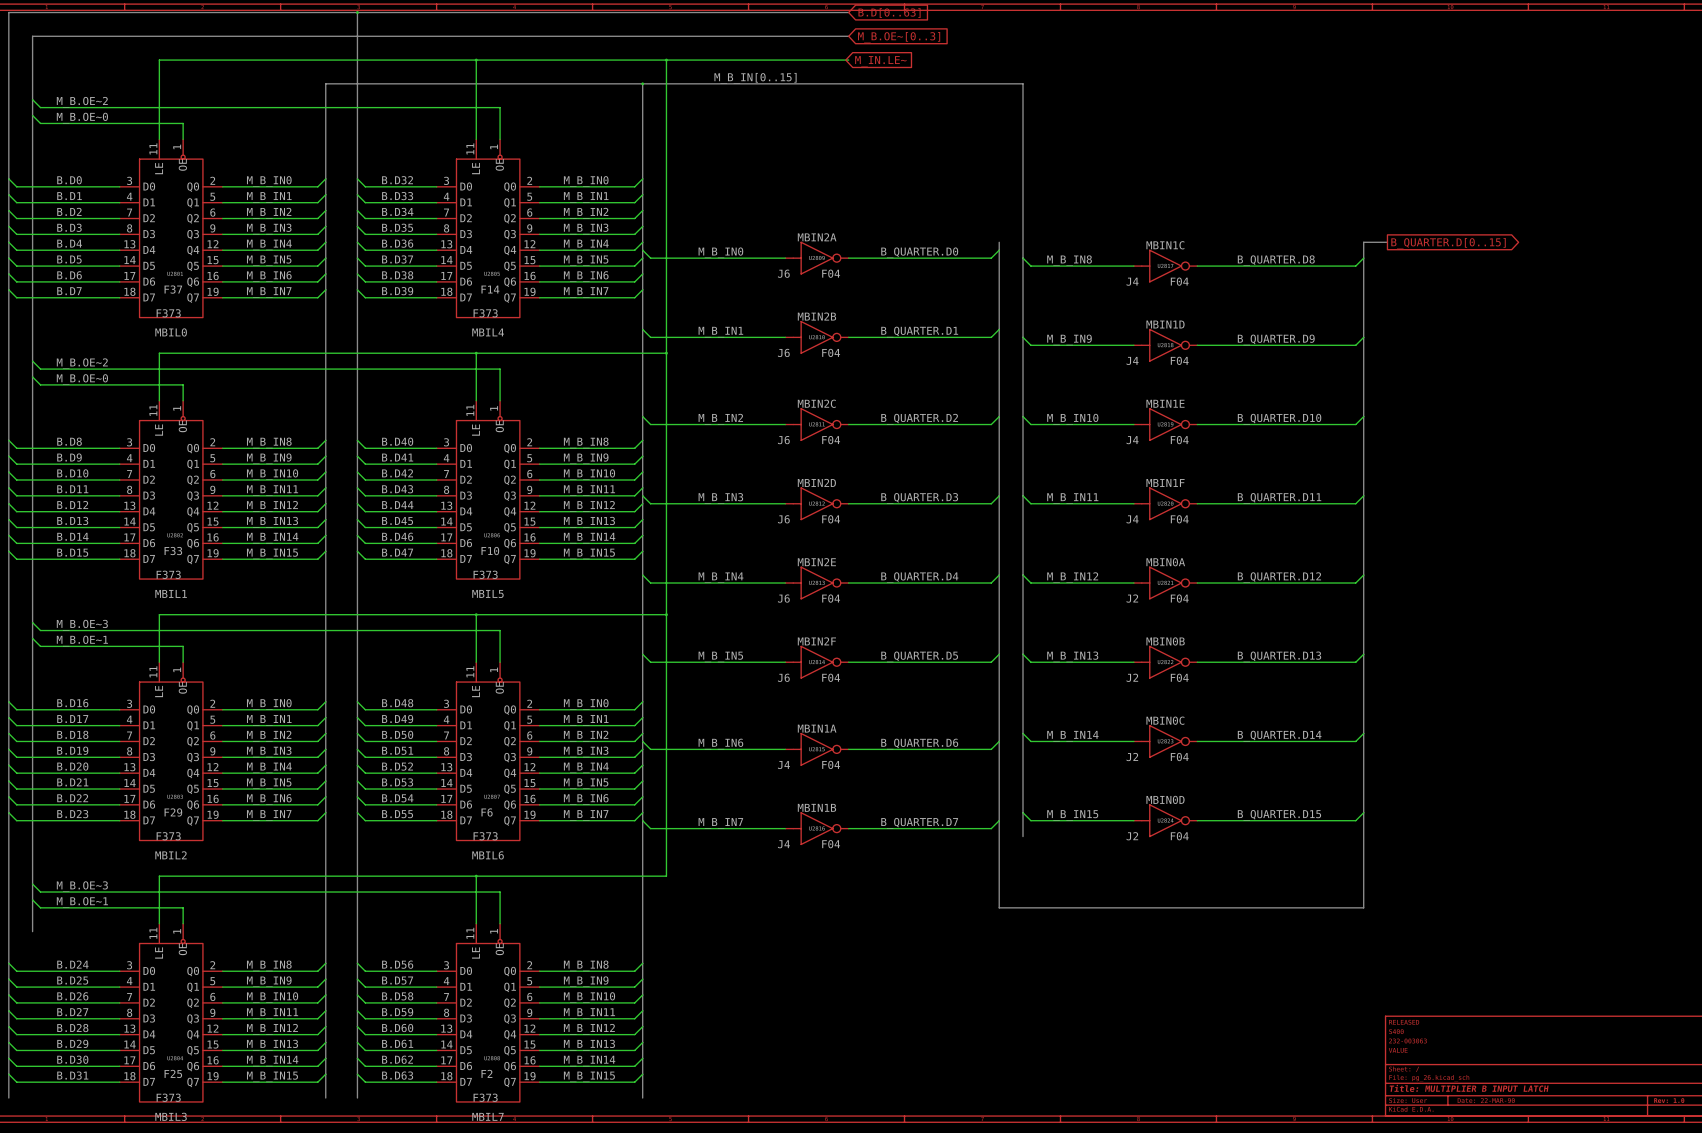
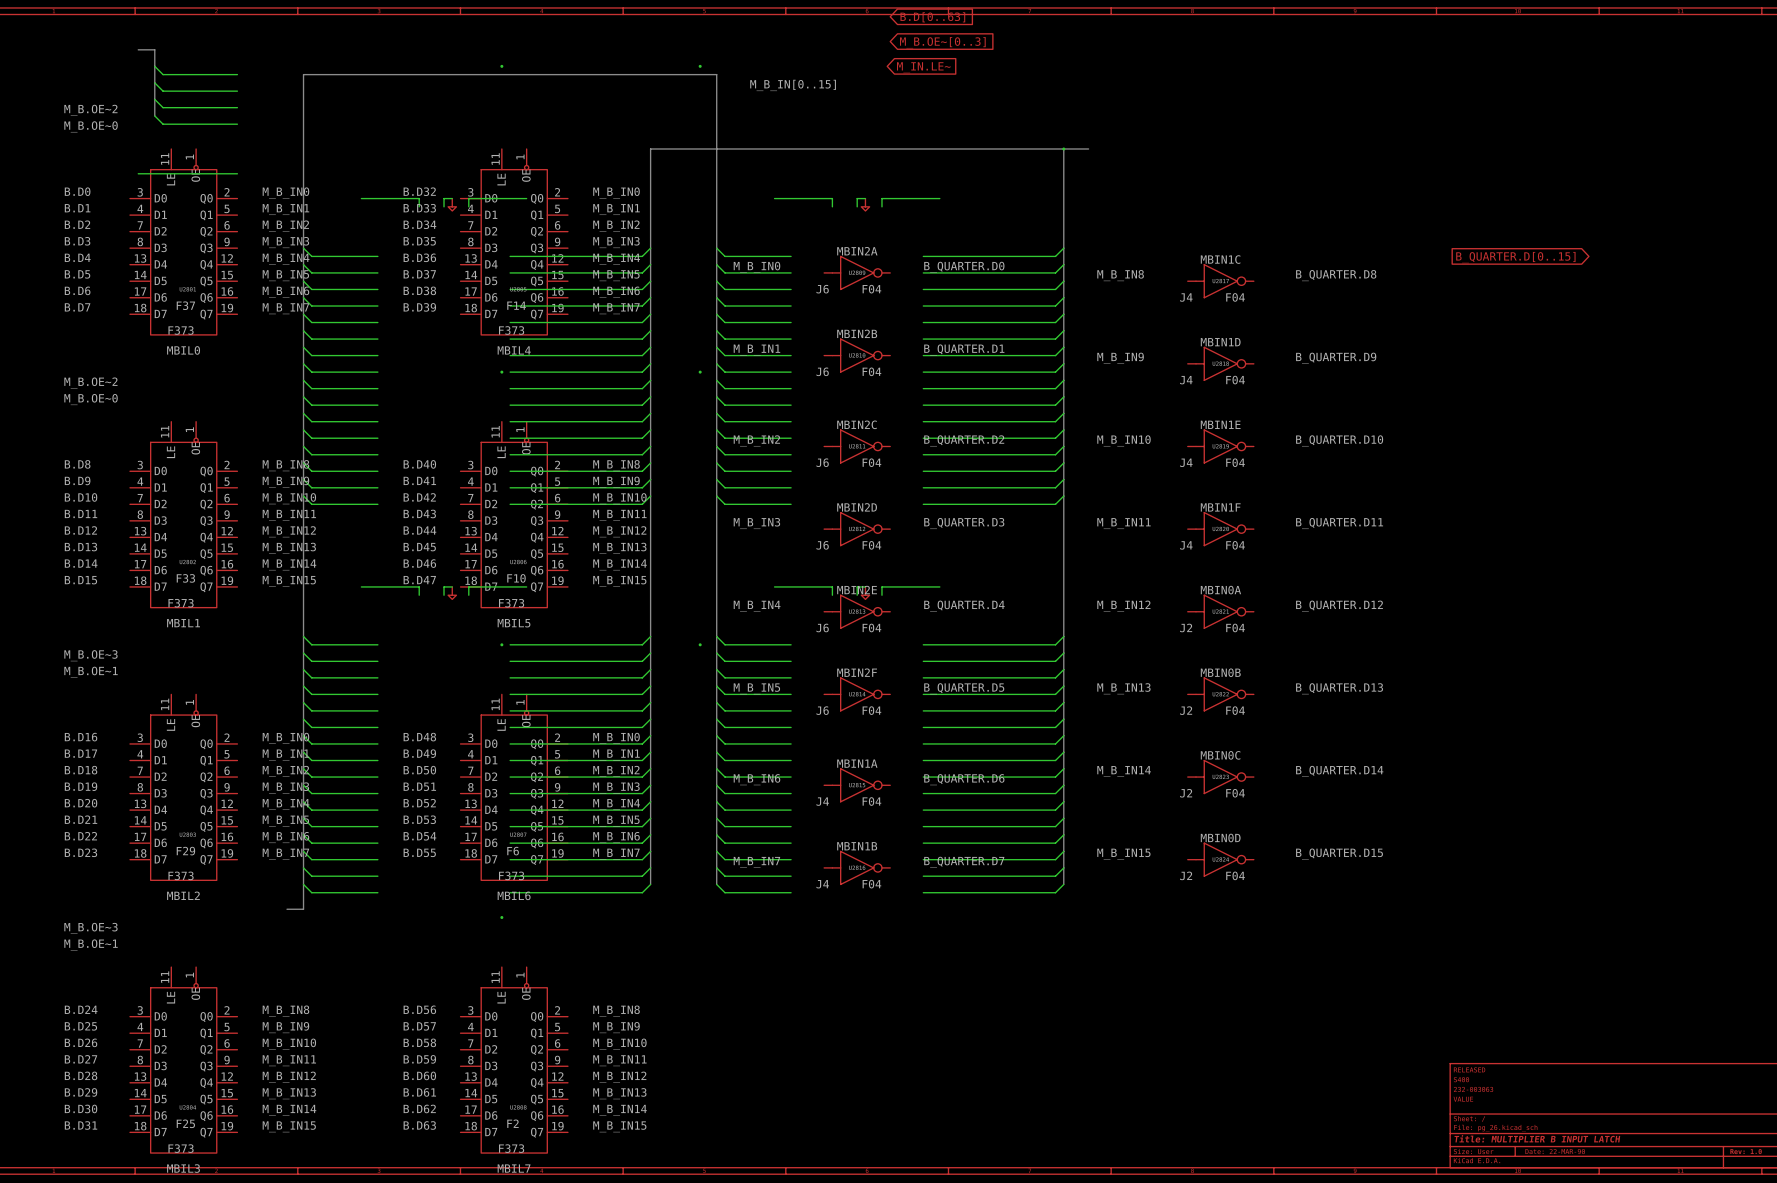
bus: (357, 12) (357, 1098) -> none
junction: (357, 12) -> none
bus: (848, 12) (8, 12) (8, 1098) -> none
bus: (848, 36) (32, 36) (32, 931) -> none
bus: none -> (138, 49) (154, 49) (154, 115)
wire: none -> (154, 66) (163, 74) (237, 74)
wire: (476, 60) (476, 139) -> none
wire: (666, 60) (666, 876) (159, 876) (159, 923) -> none
wire: (848, 60) (159, 60) (159, 139) -> none
wire: none -> (154, 82) (163, 91) (237, 91)
bus: (642, 83) (642, 1098) -> none
junction: (642, 83) -> none
wire: none -> (154, 99) (163, 107) (237, 107)
wire: (32, 99) (40, 107) (500, 107) (500, 139) -> none
wire: none -> (154, 115) (163, 124) (237, 124)
wire: (32, 115) (40, 123) (183, 123) (183, 139) -> none
bus: none -> (1063, 148) (1063, 884)
junction: none -> (1063, 148)
bus: none -> (1088, 148) (650, 148) (650, 884)
wire: none -> (138, 173) (237, 173)
wire: (8, 178) (16, 186) (119, 186) -> none
wire: (325, 178) (317, 186) (222, 186) -> none
wire: (357, 178) (365, 186) -> (361, 198) (386, 198)
wire: (642, 178) (634, 186) (539, 186) -> none
wire: (397, 186) (420, 186) -> (419, 198) (419, 206)
wire: none -> (444, 198) (444, 206)
wire: (428, 186) (436, 186) -> none
wire: none -> (526, 198) (468, 198) (468, 206)
wire: none -> (774, 198) (832, 198) (832, 206)
wire: none -> (865, 198) (857, 198) (857, 206)
wire: none -> (939, 198) (881, 198) (881, 206)
power symbol: none -> (452, 204)
power symbol: none -> (865, 204)
wire: (8, 194) (16, 202) (119, 202) -> none
wire: (325, 194) (317, 202) (222, 202) -> none
wire: (357, 194) (365, 202) (436, 202) -> none
wire: (642, 194) (634, 202) (539, 202) -> none
wire: (8, 210) (16, 218) (119, 218) -> none
wire: (325, 210) (317, 218) (222, 218) -> none
wire: (357, 210) (365, 218) (436, 218) -> none
wire: (642, 210) (634, 218) (539, 218) -> none
wire: (8, 226) (16, 234) (119, 234) -> none
wire: (325, 226) (317, 234) (222, 234) -> none
wire: (357, 226) (365, 234) (436, 234) -> none
wire: (642, 226) (634, 234) (539, 234) -> none
wire: none -> (650, 248) (642, 256) (510, 256)
wire: none -> (716, 248) (724, 256) (791, 256)
wire: none -> (1063, 248) (1055, 256) (923, 256)
wire: (8, 242) (16, 250) (119, 250) -> none
wire: (325, 242) (317, 250) (222, 250) -> none
wire: (357, 242) (365, 250) (436, 250) -> (377, 256) (311, 256) (303, 248)
wire: (642, 242) (634, 250) (539, 250) -> none
bus: (999, 242) (999, 907) (1363, 907) (1363, 242) (1387, 242) -> none
wire: none -> (650, 264) (642, 272) (510, 272)
wire: (642, 250) (650, 258) (690, 258) -> (716, 264) (724, 272)
wire: (999, 250) (991, 258) -> (1063, 264) (1055, 272) (1038, 272)
wire: (8, 258) (16, 266) (119, 266) -> none
wire: (325, 258) (317, 266) (222, 266) -> none
wire: (357, 258) (365, 266) (436, 266) -> (377, 272) (311, 272) (303, 264)
wire: (642, 258) (634, 266) (539, 266) -> none
wire: (753, 258) (785, 258) -> none
wire: (848, 258) (880, 258) -> none
wire: (1022, 258) (1030, 266) (1133, 266) -> none
wire: (1363, 258) (1355, 266) (1197, 266) -> none
wire: none -> (650, 281) (642, 289) (510, 289)
wire: none -> (716, 281) (724, 289) (791, 289)
wire: none -> (1063, 281) (1055, 289) (923, 289)
wire: (8, 273) (16, 281) (119, 281) -> none
wire: (325, 273) (317, 281) (222, 281) -> none
wire: (357, 273) (365, 281) (436, 281) -> (377, 289) (311, 289) (303, 281)
wire: (642, 273) (634, 281) (539, 281) -> none
wire: none -> (650, 297) (642, 306) (510, 306)
wire: none -> (716, 297) (724, 306) (791, 306)
wire: none -> (1063, 297) (1055, 306) (923, 306)
wire: (8, 289) (16, 297) (119, 297) -> none
wire: (325, 289) (317, 297) (222, 297) -> none
wire: (357, 289) (365, 297) (436, 297) -> (377, 306) (311, 306) (303, 297)
wire: (642, 289) (634, 297) (539, 297) -> none
wire: none -> (303, 314) (311, 322) (377, 322)
wire: none -> (650, 314) (642, 322) (510, 322)
wire: none -> (716, 314) (724, 322) (791, 322)
wire: none -> (1063, 314) (1055, 322) (923, 322)
wire: none -> (303, 330) (311, 339) (377, 339)
wire: none -> (650, 330) (642, 339) (510, 339)
wire: none -> (716, 330) (724, 339) (791, 339)
wire: none -> (1063, 330) (1055, 339) (923, 339)
wire: none -> (303, 347) (311, 355) (377, 355)
wire: none -> (650, 347) (642, 355) (510, 355)
wire: (642, 329) (650, 337) (690, 337) -> (716, 347) (724, 355)
wire: (999, 329) (991, 337) -> (1063, 347) (1055, 355) (1038, 355)
wire: (753, 337) (785, 337) -> none
wire: (848, 337) (880, 337) -> none
wire: (1022, 337) (1030, 345) (1133, 345) -> none
wire: (1363, 337) (1355, 345) (1197, 345) -> none
wire: none -> (716, 363) (724, 372) (791, 372)
wire: none -> (1063, 363) (1055, 372) (923, 372)
wire: (294, 353) (159, 353) (159, 400) -> (311, 372) (303, 363)
wire: (357, 353) (484, 353) -> none
wire: (476, 353) (476, 400) -> none
wire: (610, 353) (666, 353) -> (642, 372) (650, 363)
wire: (32, 361) (40, 369) (294, 369) -> (303, 380) (311, 388)
wire: none -> (716, 380) (724, 388) (791, 388)
wire: none -> (1063, 380) (1055, 388) (923, 388)
wire: (357, 369) (484, 369) -> none
wire: (500, 369) (500, 400) -> (526, 388) (642, 388) (650, 380)
wire: (32, 376) (40, 384) (183, 384) (183, 400) -> none
wire: none -> (303, 396) (311, 405) (377, 405)
wire: none -> (650, 396) (642, 405) (510, 405)
wire: none -> (716, 396) (724, 405) (791, 405)
wire: none -> (1063, 396) (1055, 405) (923, 405)
wire: none -> (303, 413) (311, 421) (377, 421)
wire: none -> (650, 413) (642, 421) (510, 421)
wire: none -> (716, 413) (724, 421) (791, 421)
wire: none -> (1063, 413) (1055, 421) (923, 421)
wire: none -> (303, 429) (311, 438) (377, 438)
wire: none -> (650, 429) (642, 438) (510, 438)
wire: none -> (716, 429) (724, 438) (791, 438)
wire: none -> (1063, 429) (1055, 438) (923, 438)
wire: (642, 416) (650, 424) (785, 424) -> none
wire: (999, 416) (991, 424) (848, 424) -> none
wire: (1022, 416) (1030, 424) (1133, 424) -> none
wire: (1363, 416) (1355, 424) (1197, 424) -> none
wire: none -> (303, 446) (311, 454) (377, 454)
wire: none -> (650, 446) (642, 454) (510, 454)
wire: none -> (716, 446) (724, 454) (791, 454)
wire: none -> (1063, 446) (1055, 454) (923, 454)
wire: (8, 440) (16, 448) (119, 448) -> none
wire: (325, 440) (317, 448) -> (377, 471) (336, 471)
wire: (357, 440) (365, 448) (436, 448) -> none
wire: (642, 440) (634, 448) (610, 448) -> (650, 463) (642, 471)
wire: none -> (716, 463) (724, 471) (791, 471)
wire: none -> (1063, 463) (1055, 471) (923, 471)
wire: (222, 448) (294, 448) -> (303, 463) (311, 471)
wire: none -> (510, 471) (567, 471)
wire: (8, 456) (16, 464) (119, 464) -> none
wire: (325, 456) (317, 464) -> (377, 487) (336, 487)
wire: (357, 456) (365, 464) (436, 464) -> none
wire: (642, 456) (634, 464) (610, 464) -> (650, 479) (642, 487)
wire: none -> (716, 479) (724, 487) (791, 487)
wire: none -> (1063, 479) (1055, 487) (923, 487)
wire: (222, 464) (294, 464) -> (303, 479) (311, 487)
wire: none -> (510, 487) (567, 487)
wire: (8, 472) (16, 479) (119, 479) -> none
wire: (325, 472) (317, 479) -> (377, 504) (336, 504)
wire: (357, 472) (365, 479) (436, 479) -> none
wire: (642, 472) (634, 479) (610, 479) -> (650, 496) (642, 504)
wire: none -> (716, 496) (724, 504) (791, 504)
wire: none -> (1063, 496) (1055, 504) (923, 504)
wire: (222, 479) (294, 479) -> (303, 496) (311, 504)
wire: none -> (510, 504) (567, 504)
wire: (8, 487) (16, 495) (119, 495) -> none
wire: (325, 487) (317, 495) (222, 495) -> none
wire: (357, 487) (365, 495) (436, 495) -> none
wire: (642, 487) (634, 495) (539, 495) -> none
wire: (642, 495) (650, 503) (785, 503) -> none
wire: (999, 495) (991, 503) (848, 503) -> none
wire: (1022, 495) (1030, 503) (1133, 503) -> none
wire: (1363, 495) (1355, 503) (1197, 503) -> none
wire: (8, 503) (16, 511) (119, 511) -> none
wire: (325, 503) (317, 511) (222, 511) -> none
wire: (357, 503) (365, 511) (436, 511) -> none
wire: (642, 503) (634, 511) (539, 511) -> none
wire: (8, 519) (16, 527) (119, 527) -> none
wire: (325, 519) (317, 527) (222, 527) -> none
wire: (357, 519) (365, 527) (436, 527) -> none
wire: (642, 519) (634, 527) (539, 527) -> none
wire: (8, 535) (16, 543) (119, 543) -> none
wire: (325, 535) (317, 543) (222, 543) -> none
wire: (357, 535) (365, 543) (436, 543) -> none
wire: (642, 535) (634, 543) (539, 543) -> none
wire: (8, 551) (16, 559) (119, 559) -> none
wire: (325, 551) (317, 559) (222, 559) -> none
wire: (357, 551) (365, 559) -> (361, 586) (386, 586)
wire: (642, 551) (634, 559) (539, 559) -> none
wire: (397, 559) (420, 559) -> (419, 586) (419, 595)
wire: none -> (444, 586) (444, 595)
wire: (428, 559) (436, 559) -> none
wire: none -> (526, 586) (468, 586) (468, 595)
wire: none -> (774, 586) (832, 586) (832, 595)
wire: none -> (865, 586) (857, 586) (857, 595)
wire: none -> (939, 586) (881, 586) (881, 595)
power symbol: none -> (452, 593)
power symbol: none -> (865, 593)
wire: (642, 575) (650, 583) (785, 583) -> none
wire: (999, 575) (991, 583) (848, 583) -> none
wire: (1022, 575) (1030, 583) (1133, 583) -> none
wire: (1363, 575) (1355, 583) (1197, 583) -> none
wire: none -> (716, 636) (724, 644) (791, 644)
wire: none -> (1063, 636) (1055, 644) (923, 644)
wire: (294, 614) (159, 614) (159, 662) -> (311, 644) (303, 636)
wire: (357, 614) (484, 614) -> none
wire: (476, 614) (476, 662) -> none
wire: (610, 614) (666, 614) -> (642, 644) (650, 636)
wire: (32, 622) (40, 630) (294, 630) -> (303, 653) (311, 661)
wire: none -> (716, 653) (724, 661) (791, 661)
wire: none -> (1063, 653) (1055, 661) (923, 661)
wire: (357, 630) (484, 630) -> none
wire: (500, 630) (500, 662) -> (526, 661) (642, 661) (650, 653)
wire: (32, 638) (40, 646) (183, 646) (183, 662) -> none
wire: none -> (303, 669) (311, 677) (377, 677)
wire: none -> (650, 669) (642, 677) (510, 677)
wire: none -> (716, 669) (724, 677) (791, 677)
wire: none -> (1063, 669) (1055, 677) (923, 677)
wire: none -> (303, 686) (311, 694) (377, 694)
wire: none -> (650, 686) (642, 694) (510, 694)
wire: (642, 654) (650, 662) (690, 662) -> (716, 686) (724, 694)
wire: (999, 654) (991, 662) -> (1063, 686) (1055, 694) (1038, 694)
wire: (1022, 654) (1030, 662) (1133, 662) -> none
wire: (1363, 654) (1355, 662) (1197, 662) -> none
wire: (753, 662) (785, 662) -> none
wire: (848, 662) (880, 662) -> none
wire: none -> (303, 702) (311, 710) (377, 710)
wire: none -> (650, 702) (642, 710) (510, 710)
wire: none -> (716, 702) (724, 710) (791, 710)
wire: none -> (1063, 702) (1055, 710) (923, 710)
wire: none -> (303, 719) (311, 727) (377, 727)
wire: none -> (650, 719) (642, 727) (510, 727)
wire: none -> (716, 719) (724, 727) (791, 727)
wire: none -> (1063, 719) (1055, 727) (923, 727)
wire: (8, 701) (16, 709) (119, 709) -> none
wire: (325, 701) (317, 709) -> (377, 743) (336, 743)
wire: (357, 701) (365, 709) (436, 709) -> none
wire: (642, 701) (634, 709) (610, 709) -> (650, 735) (642, 743)
wire: none -> (716, 735) (724, 743) (791, 743)
wire: none -> (1063, 735) (1055, 743) (923, 743)
wire: (222, 709) (294, 709) -> (303, 735) (311, 743)
wire: none -> (510, 743) (567, 743)
wire: (8, 717) (16, 725) (119, 725) -> none
wire: (325, 717) (317, 725) -> (377, 760) (336, 760)
wire: (357, 717) (365, 725) (436, 725) -> none
wire: (642, 717) (634, 725) (610, 725) -> (650, 752) (642, 760)
wire: none -> (716, 752) (724, 760) (791, 760)
wire: none -> (1063, 752) (1055, 760) (923, 760)
wire: (222, 725) (294, 725) -> (303, 752) (311, 760)
wire: none -> (510, 760) (567, 760)
wire: (8, 733) (16, 741) (119, 741) -> none
wire: (325, 733) (317, 741) -> (377, 777) (336, 777)
wire: (357, 733) (365, 741) (436, 741) -> none
wire: (642, 733) (634, 741) (610, 741) -> (650, 768) (642, 777)
wire: none -> (716, 768) (724, 777) (791, 777)
wire: none -> (1063, 768) (1055, 777) (923, 777)
wire: (1022, 733) (1030, 741) (1133, 741) -> none
wire: (1363, 733) (1355, 741) (1197, 741) -> none
wire: (222, 741) (294, 741) -> (303, 768) (311, 777)
wire: none -> (510, 777) (567, 777)
wire: (642, 741) (650, 749) (785, 749) -> none
wire: (999, 741) (991, 749) (848, 749) -> none
wire: (8, 749) (16, 757) (119, 757) -> none
wire: (325, 749) (317, 757) -> (377, 793) (336, 793)
wire: (357, 749) (365, 757) (436, 757) -> none
wire: (642, 749) (634, 757) (610, 757) -> (650, 785) (642, 793)
wire: none -> (716, 785) (724, 793) (791, 793)
wire: none -> (1063, 785) (1055, 793) (923, 793)
wire: (222, 757) (294, 757) -> (303, 785) (311, 793)
wire: none -> (510, 793) (567, 793)
wire: (8, 765) (16, 773) (119, 773) -> none
wire: (325, 765) (317, 773) -> (377, 810) (336, 810)
wire: (357, 765) (365, 773) (436, 773) -> none
wire: (642, 765) (634, 773) (610, 773) -> (650, 801) (642, 810)
wire: none -> (716, 801) (724, 810) (791, 810)
wire: none -> (1063, 801) (1055, 810) (923, 810)
wire: (222, 773) (294, 773) -> (303, 801) (311, 810)
wire: none -> (510, 810) (567, 810)
wire: (8, 781) (16, 789) (119, 789) -> none
wire: (325, 781) (317, 789) -> (377, 826) (336, 826)
wire: (357, 781) (365, 789) (436, 789) -> none
wire: (642, 781) (634, 789) (610, 789) -> (650, 818) (642, 826)
wire: none -> (716, 818) (724, 826) (791, 826)
wire: none -> (1063, 818) (1055, 826) (923, 826)
wire: (222, 789) (294, 789) -> (303, 818) (311, 826)
wire: none -> (510, 826) (567, 826)
wire: (8, 796) (16, 804) (119, 804) -> none
wire: (325, 796) (317, 804) -> (377, 843) (336, 843)
wire: (357, 796) (365, 804) (436, 804) -> none
wire: (642, 796) (634, 804) (610, 804) -> (650, 834) (642, 843)
wire: none -> (716, 834) (724, 843) (791, 843)
wire: none -> (1063, 834) (1055, 843) (923, 843)
wire: (222, 804) (294, 804) -> (303, 834) (311, 843)
wire: none -> (510, 843) (567, 843)
wire: (8, 812) (16, 820) (119, 820) -> none
wire: (325, 812) (317, 820) -> (377, 859) (336, 859)
wire: (357, 812) (365, 820) (436, 820) -> none
wire: (642, 812) (634, 820) (610, 820) -> (650, 851) (642, 859)
wire: none -> (716, 851) (724, 859) (791, 859)
wire: none -> (1063, 851) (1055, 859) (923, 859)
wire: (1022, 812) (1030, 820) (1133, 820) -> none
wire: (1363, 812) (1355, 820) (1197, 820) -> none
wire: (222, 820) (294, 820) -> (303, 851) (311, 859)
wire: none -> (510, 859) (567, 859)
wire: (642, 820) (650, 828) (785, 828) -> none
wire: (999, 820) (991, 828) (848, 828) -> none
wire: none -> (303, 867) (311, 876) (377, 876)
wire: none -> (650, 867) (642, 876) (510, 876)
wire: none -> (716, 867) (724, 876) (791, 876)
wire: none -> (1063, 867) (1055, 876) (923, 876)
bus: (1022, 836) (1022, 83) (325, 83) (325, 1098) -> none
wire: none -> (303, 884) (311, 892) (377, 892)
wire: none -> (650, 884) (642, 892) (510, 892)
bus: none -> (716, 884) (716, 74) (303, 74) (303, 909) (287, 909)
wire: none -> (716, 884) (724, 892) (791, 892)
wire: none -> (1063, 884) (1055, 892) (923, 892)
wire: (476, 876) (476, 923) -> none
wire: (32, 884) (40, 892) (500, 892) (500, 923) -> none
wire: (32, 899) (40, 907) (183, 907) (183, 923) -> none
wire: (8, 963) (16, 971) (119, 971) -> none
wire: (325, 963) (317, 971) (222, 971) -> none
wire: (357, 963) (365, 971) (436, 971) -> none
wire: (642, 963) (634, 971) (539, 971) -> none
wire: (8, 979) (16, 987) (119, 987) -> none
wire: (325, 979) (317, 987) (222, 987) -> none
wire: (357, 979) (365, 987) (436, 987) -> none
wire: (642, 979) (634, 987) (539, 987) -> none
wire: (8, 995) (16, 1002) (119, 1002) -> none
wire: (325, 995) (317, 1002) (222, 1002) -> none
wire: (357, 995) (365, 1002) (436, 1002) -> none
wire: (642, 995) (634, 1002) (539, 1002) -> none
wire: (8, 1010) (16, 1018) (119, 1018) -> none
wire: (325, 1010) (317, 1018) (222, 1018) -> none
wire: (357, 1010) (365, 1018) (436, 1018) -> none
wire: (642, 1010) (634, 1018) (539, 1018) -> none
wire: (8, 1026) (16, 1034) (119, 1034) -> none
wire: (325, 1026) (317, 1034) (222, 1034) -> none
wire: (357, 1026) (365, 1034) (436, 1034) -> none
wire: (642, 1026) (634, 1034) (539, 1034) -> none
wire: (8, 1042) (16, 1050) (119, 1050) -> none
wire: (325, 1042) (317, 1050) (222, 1050) -> none
wire: (357, 1042) (365, 1050) (436, 1050) -> none
wire: (642, 1042) (634, 1050) (539, 1050) -> none
wire: (8, 1058) (16, 1066) (119, 1066) -> none
wire: (325, 1058) (317, 1066) (222, 1066) -> none
wire: (357, 1058) (365, 1066) (436, 1066) -> none
wire: (642, 1058) (634, 1066) (539, 1066) -> none
wire: (8, 1074) (16, 1082) (119, 1082) -> none
wire: (325, 1074) (317, 1082) (222, 1082) -> none
wire: (357, 1074) (365, 1082) (436, 1082) -> none
wire: (642, 1074) (634, 1082) (539, 1082) -> none

